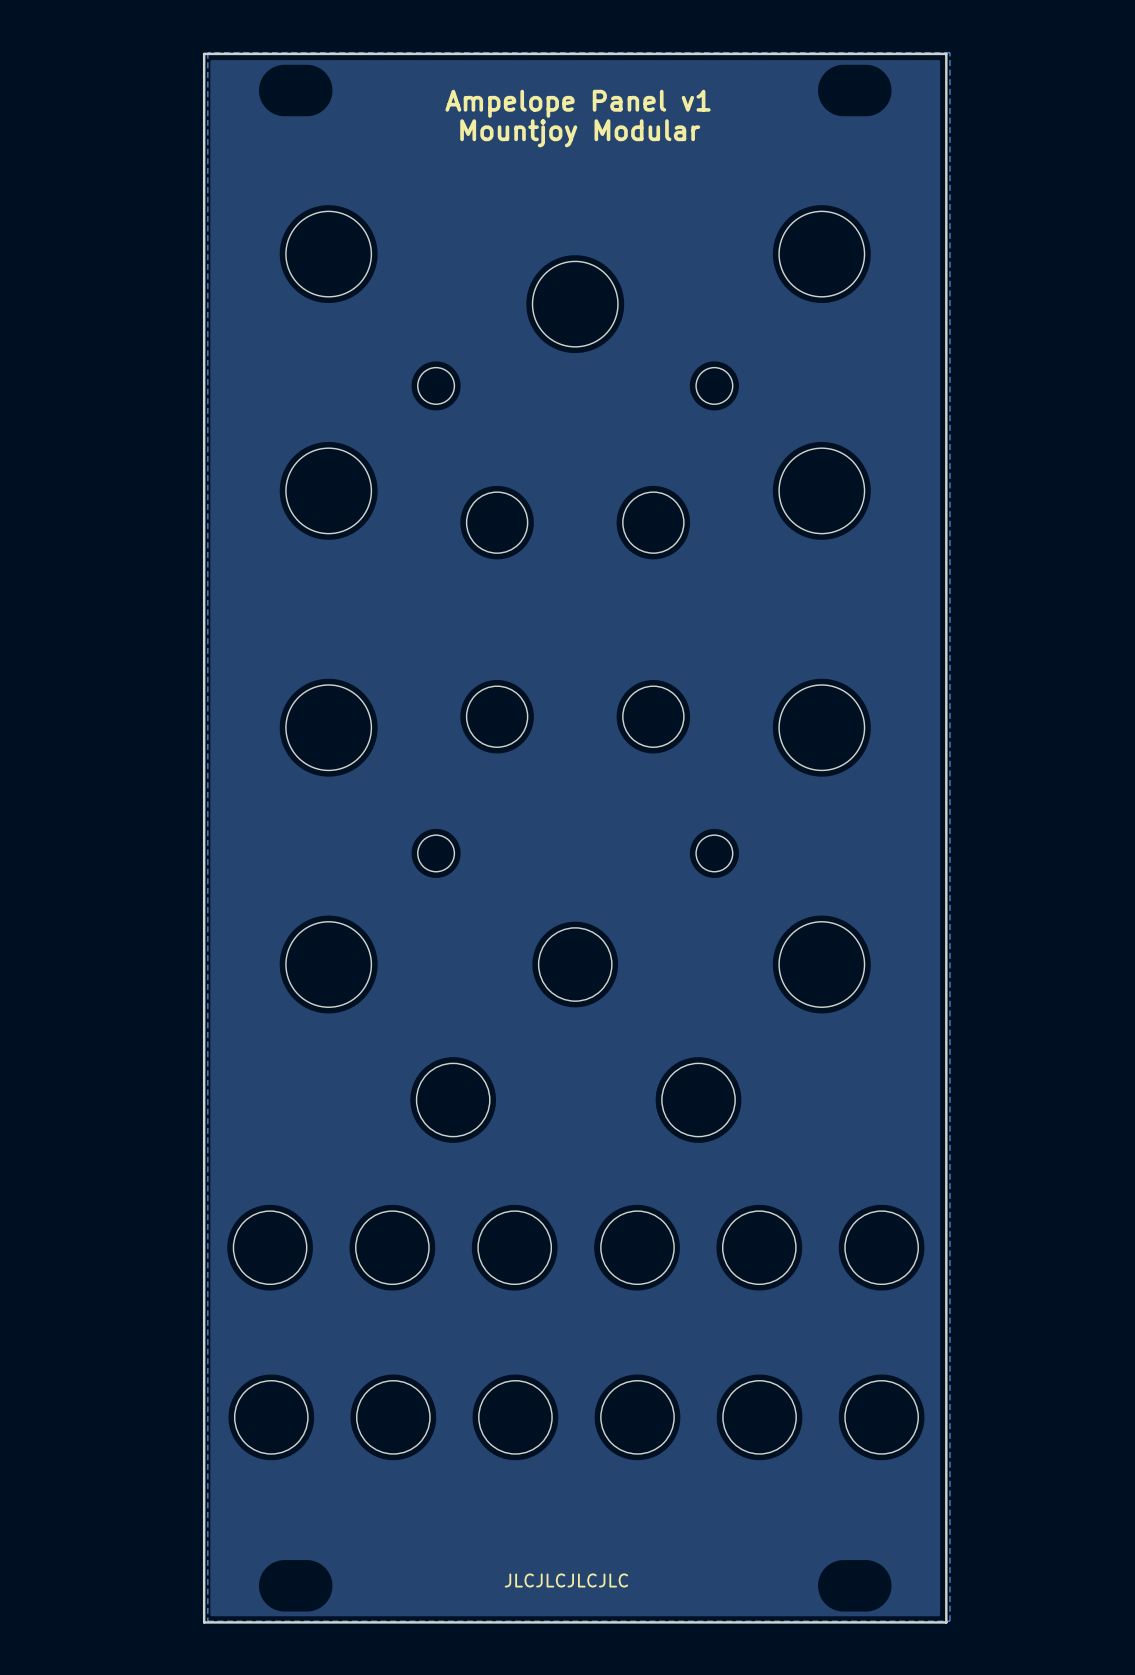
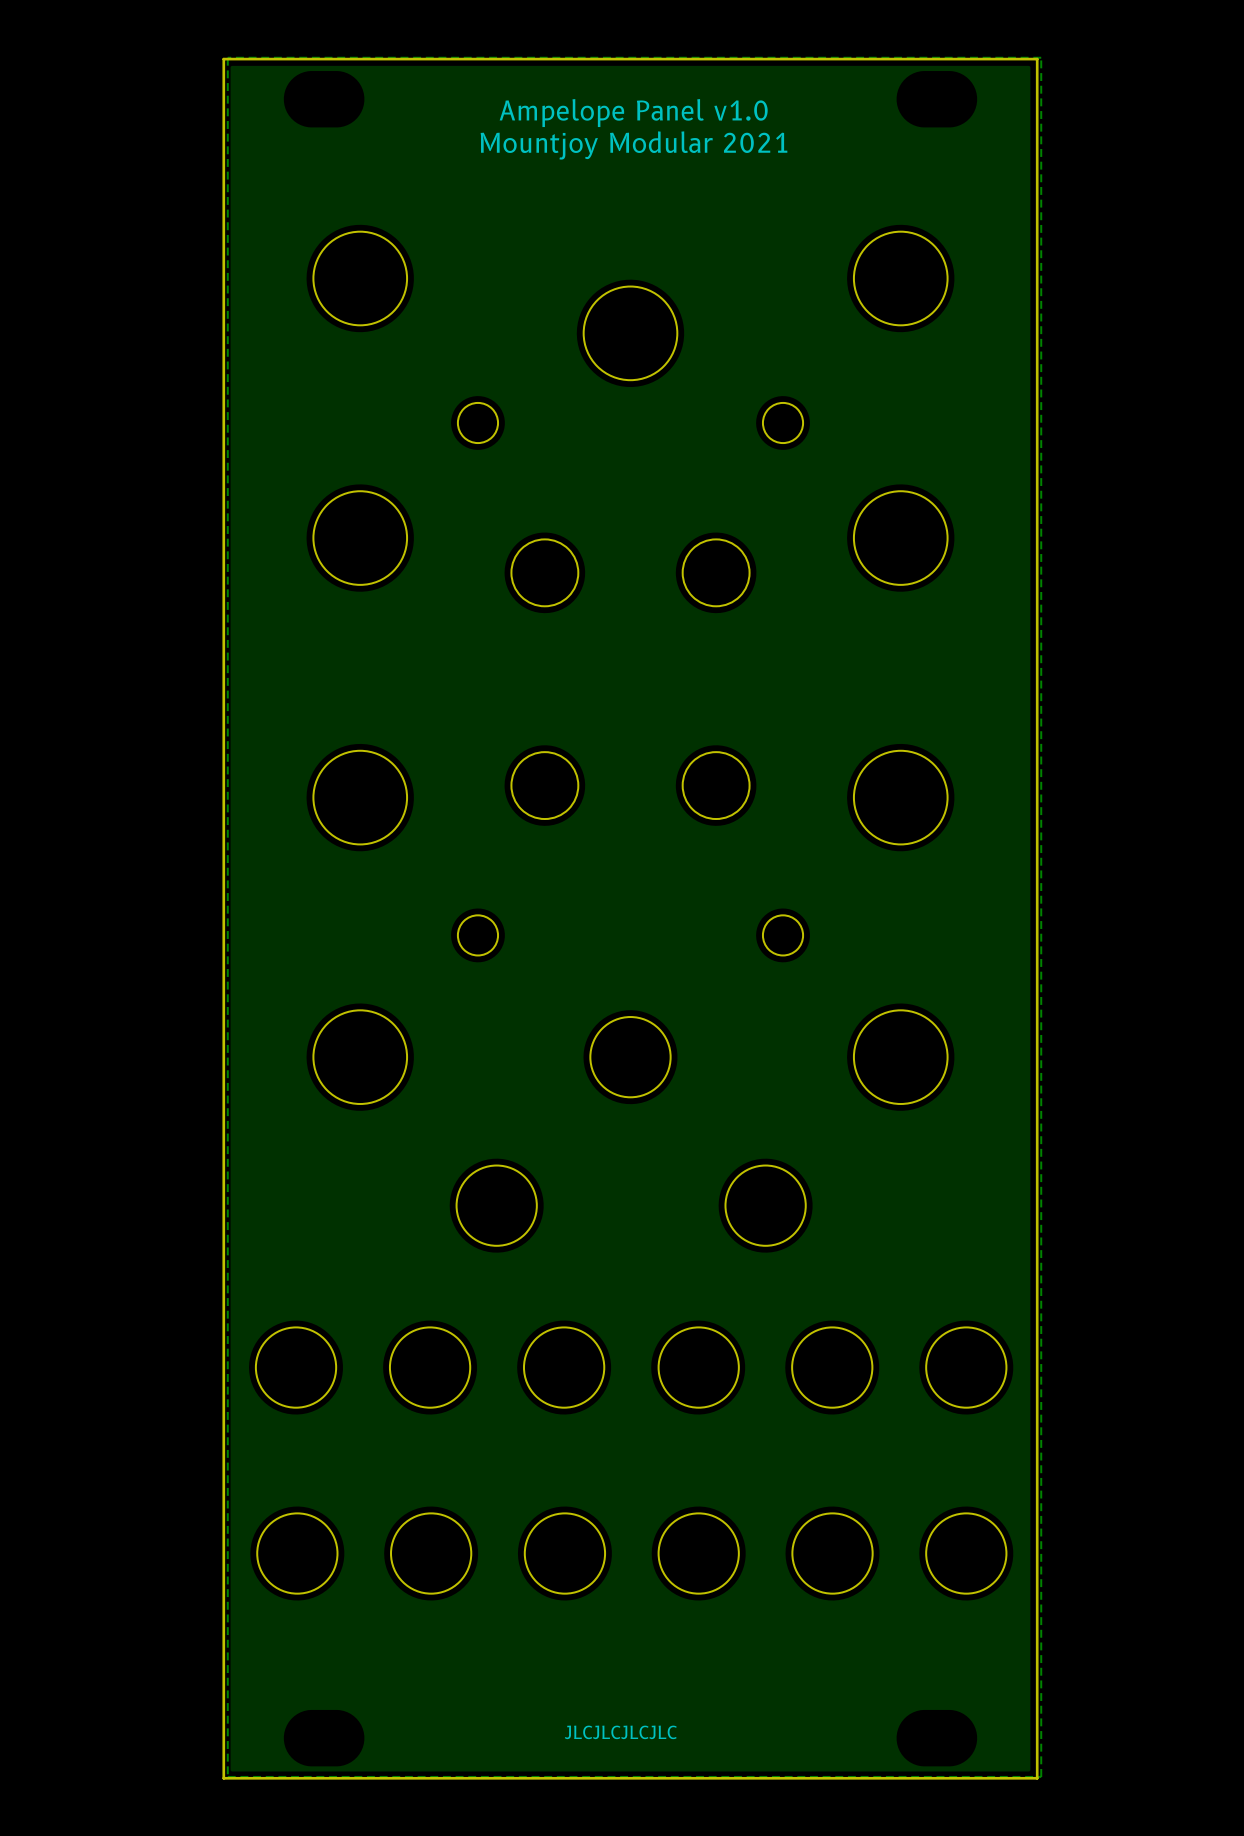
text: Ampelope Panel v1 (578, 103) -> Ampelope Panel v1.0 (633, 113)
text: Mountjoy Modular (580, 133) -> Mountjoy Modular 2021 (633, 145)

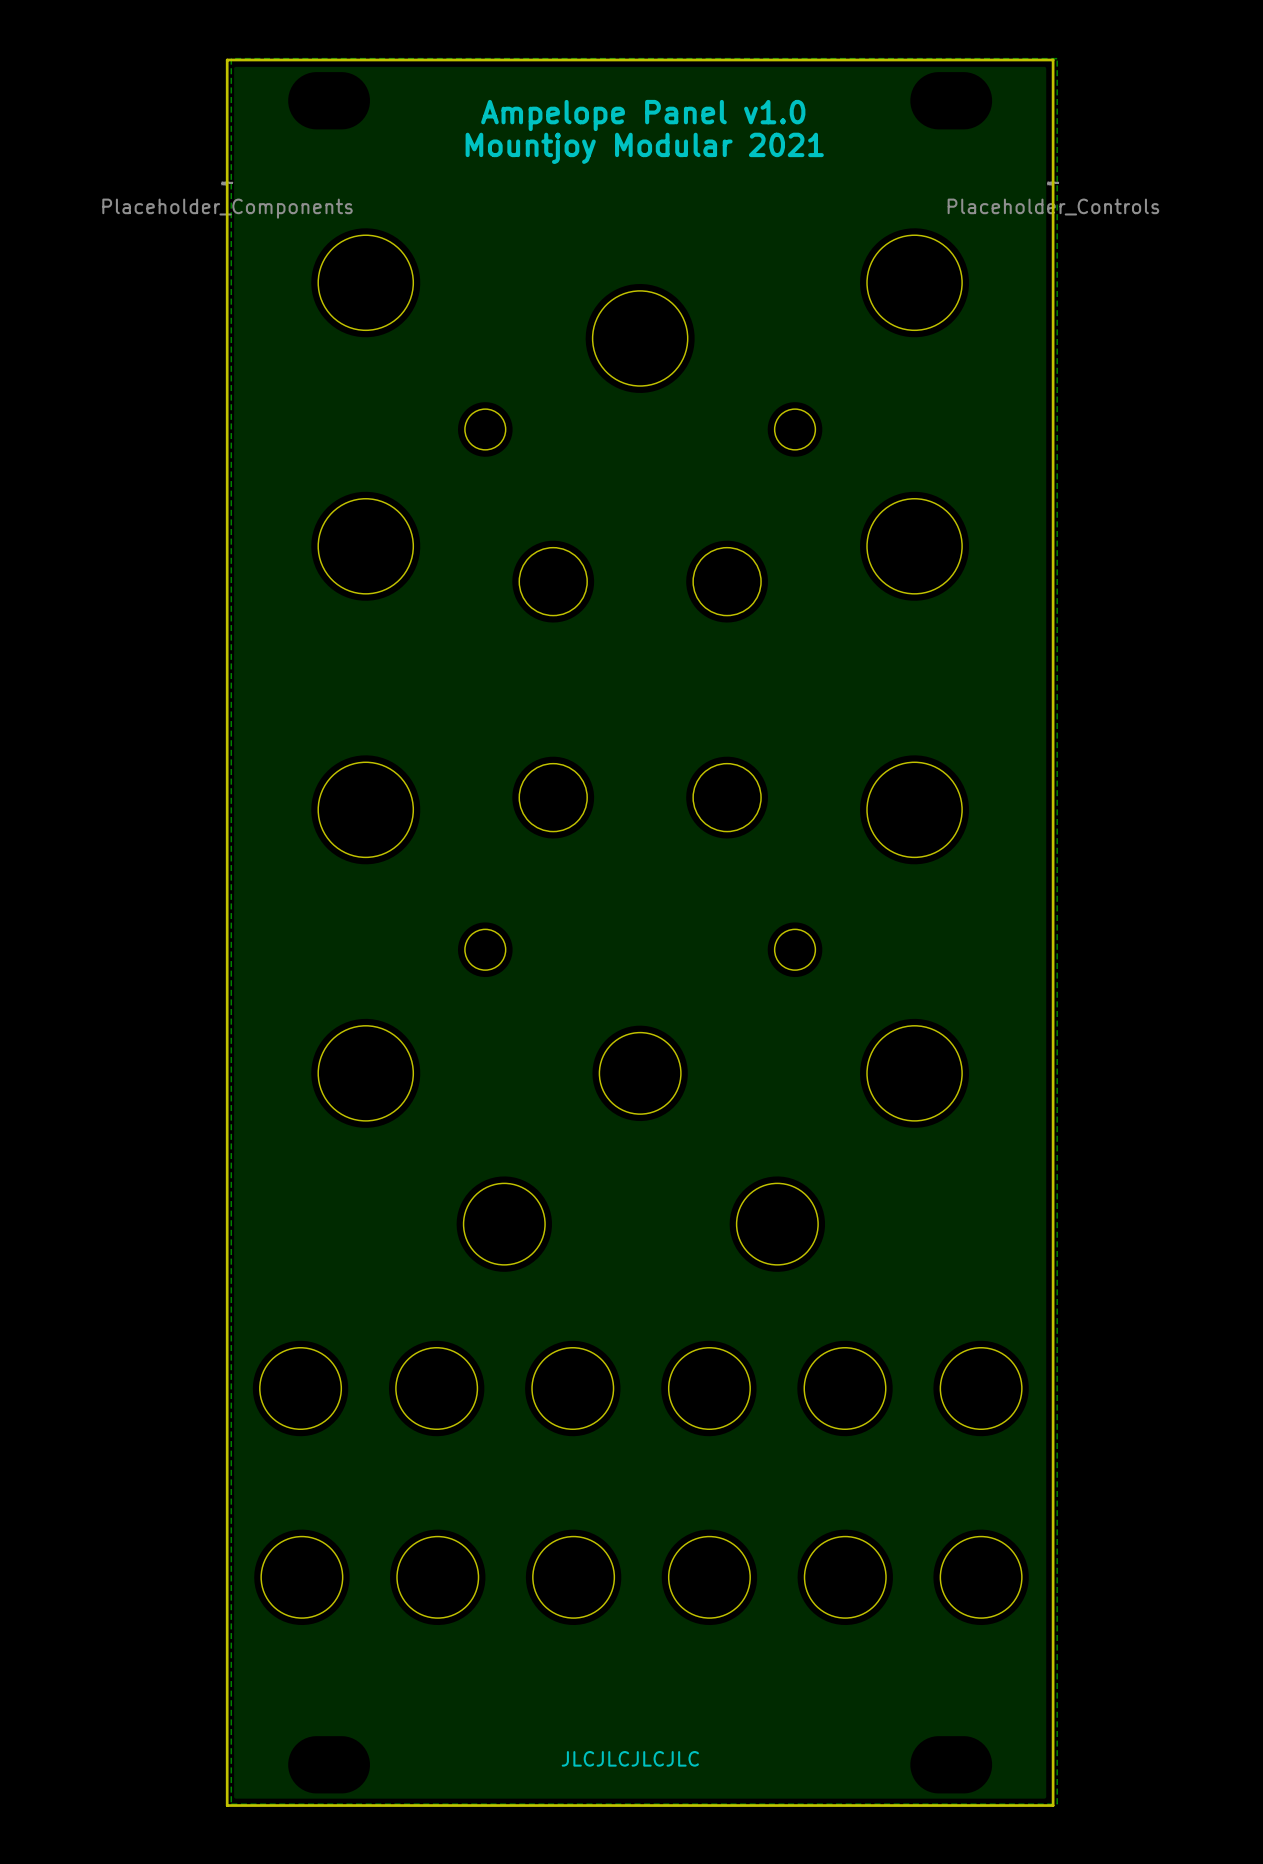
part: none -> Placeholder_Components (227, 200)
part: none -> Placeholder_Controls (1053, 198)

